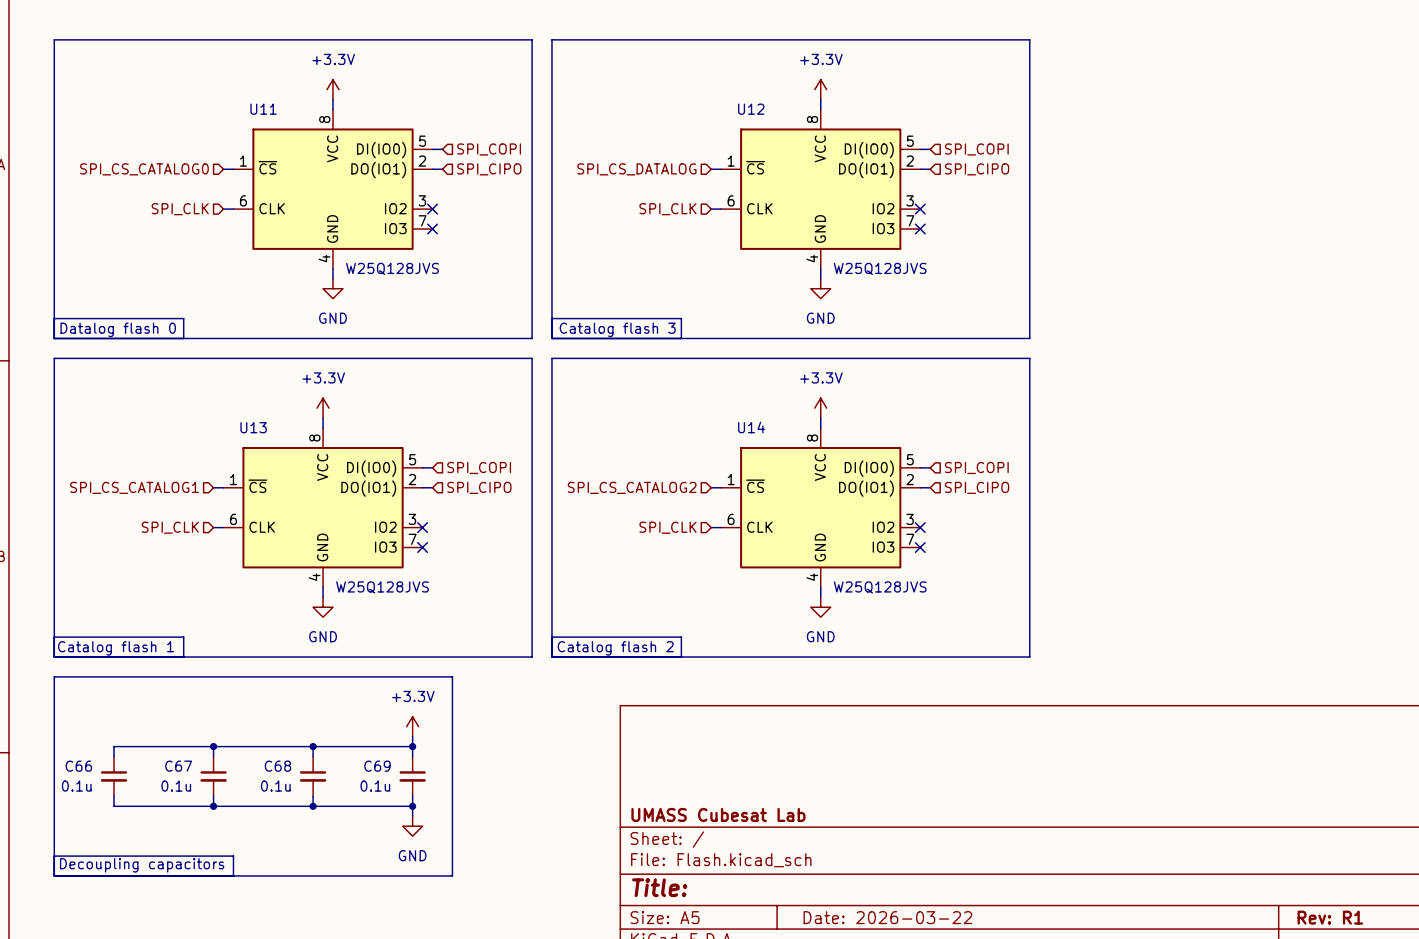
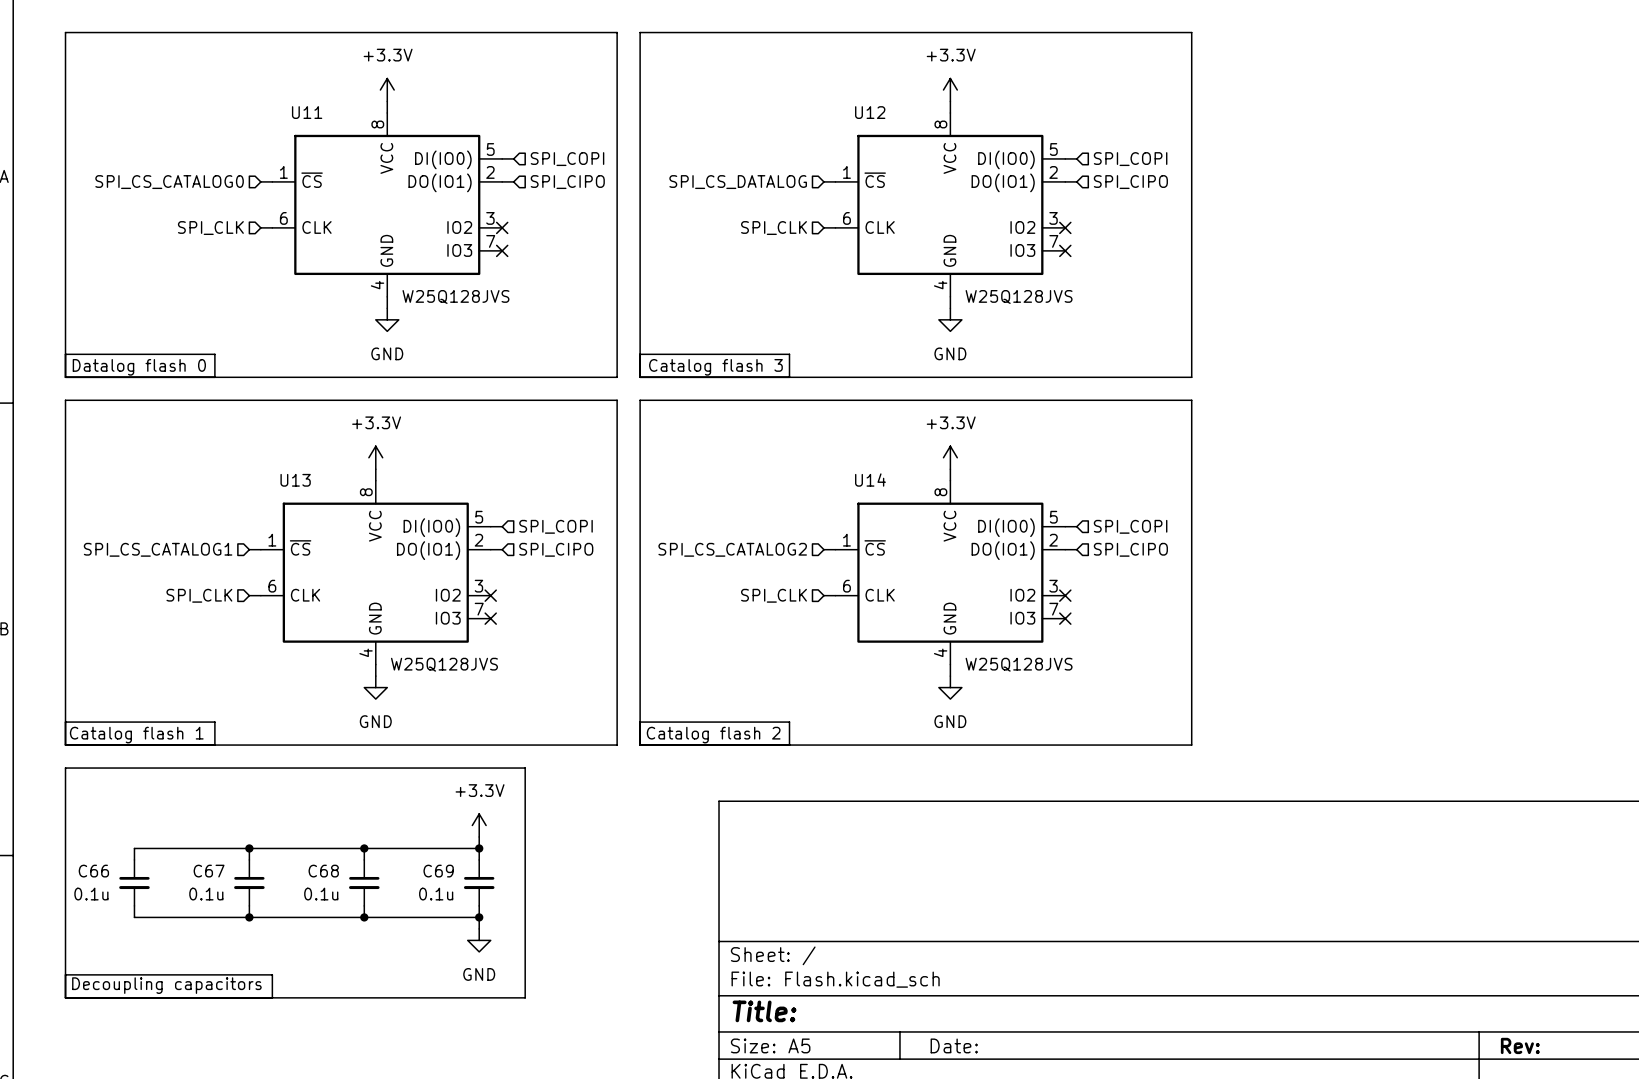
title block: UMASS Cubesat Lab (718, 814) -> none
title block: Date: 2026-03-22 (887, 917) -> Date: (954, 1045)
title block: Rev: R1 (1330, 917) -> Rev: (1520, 1045)

